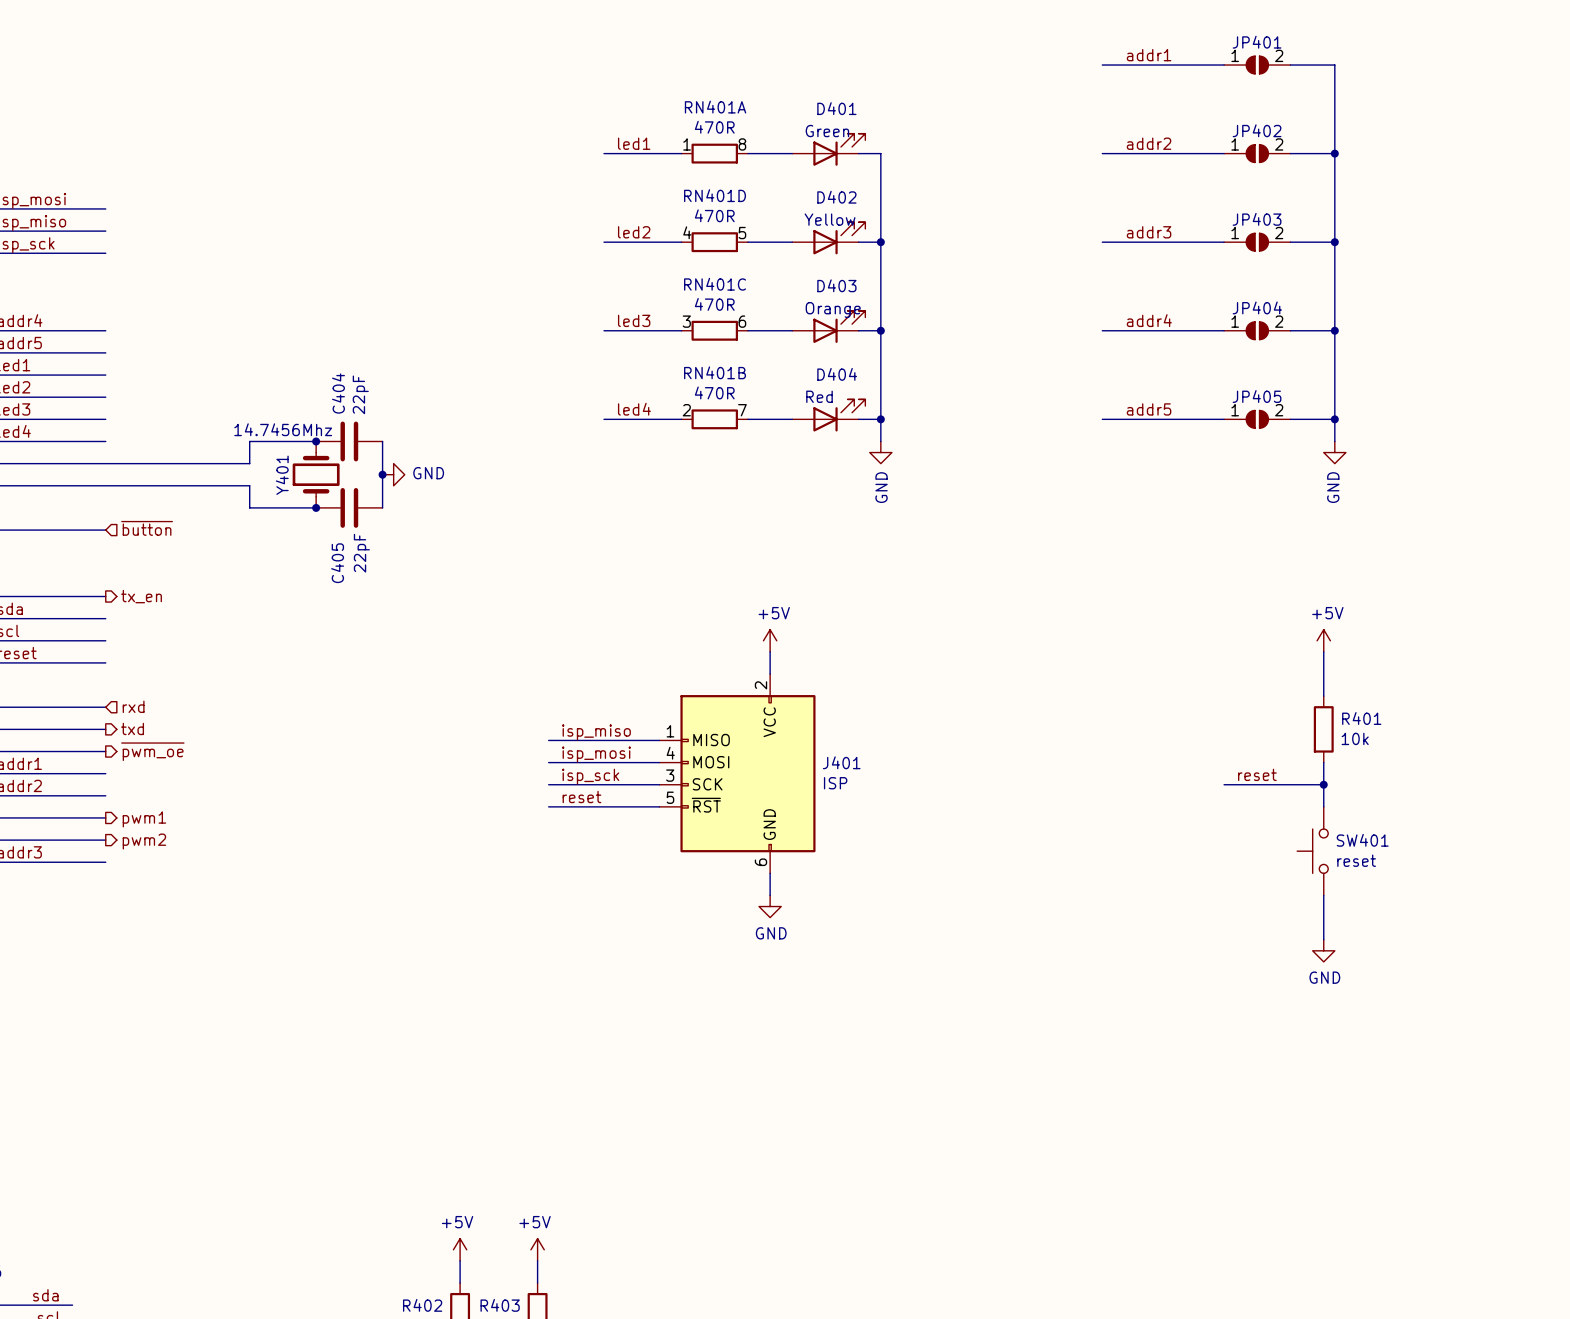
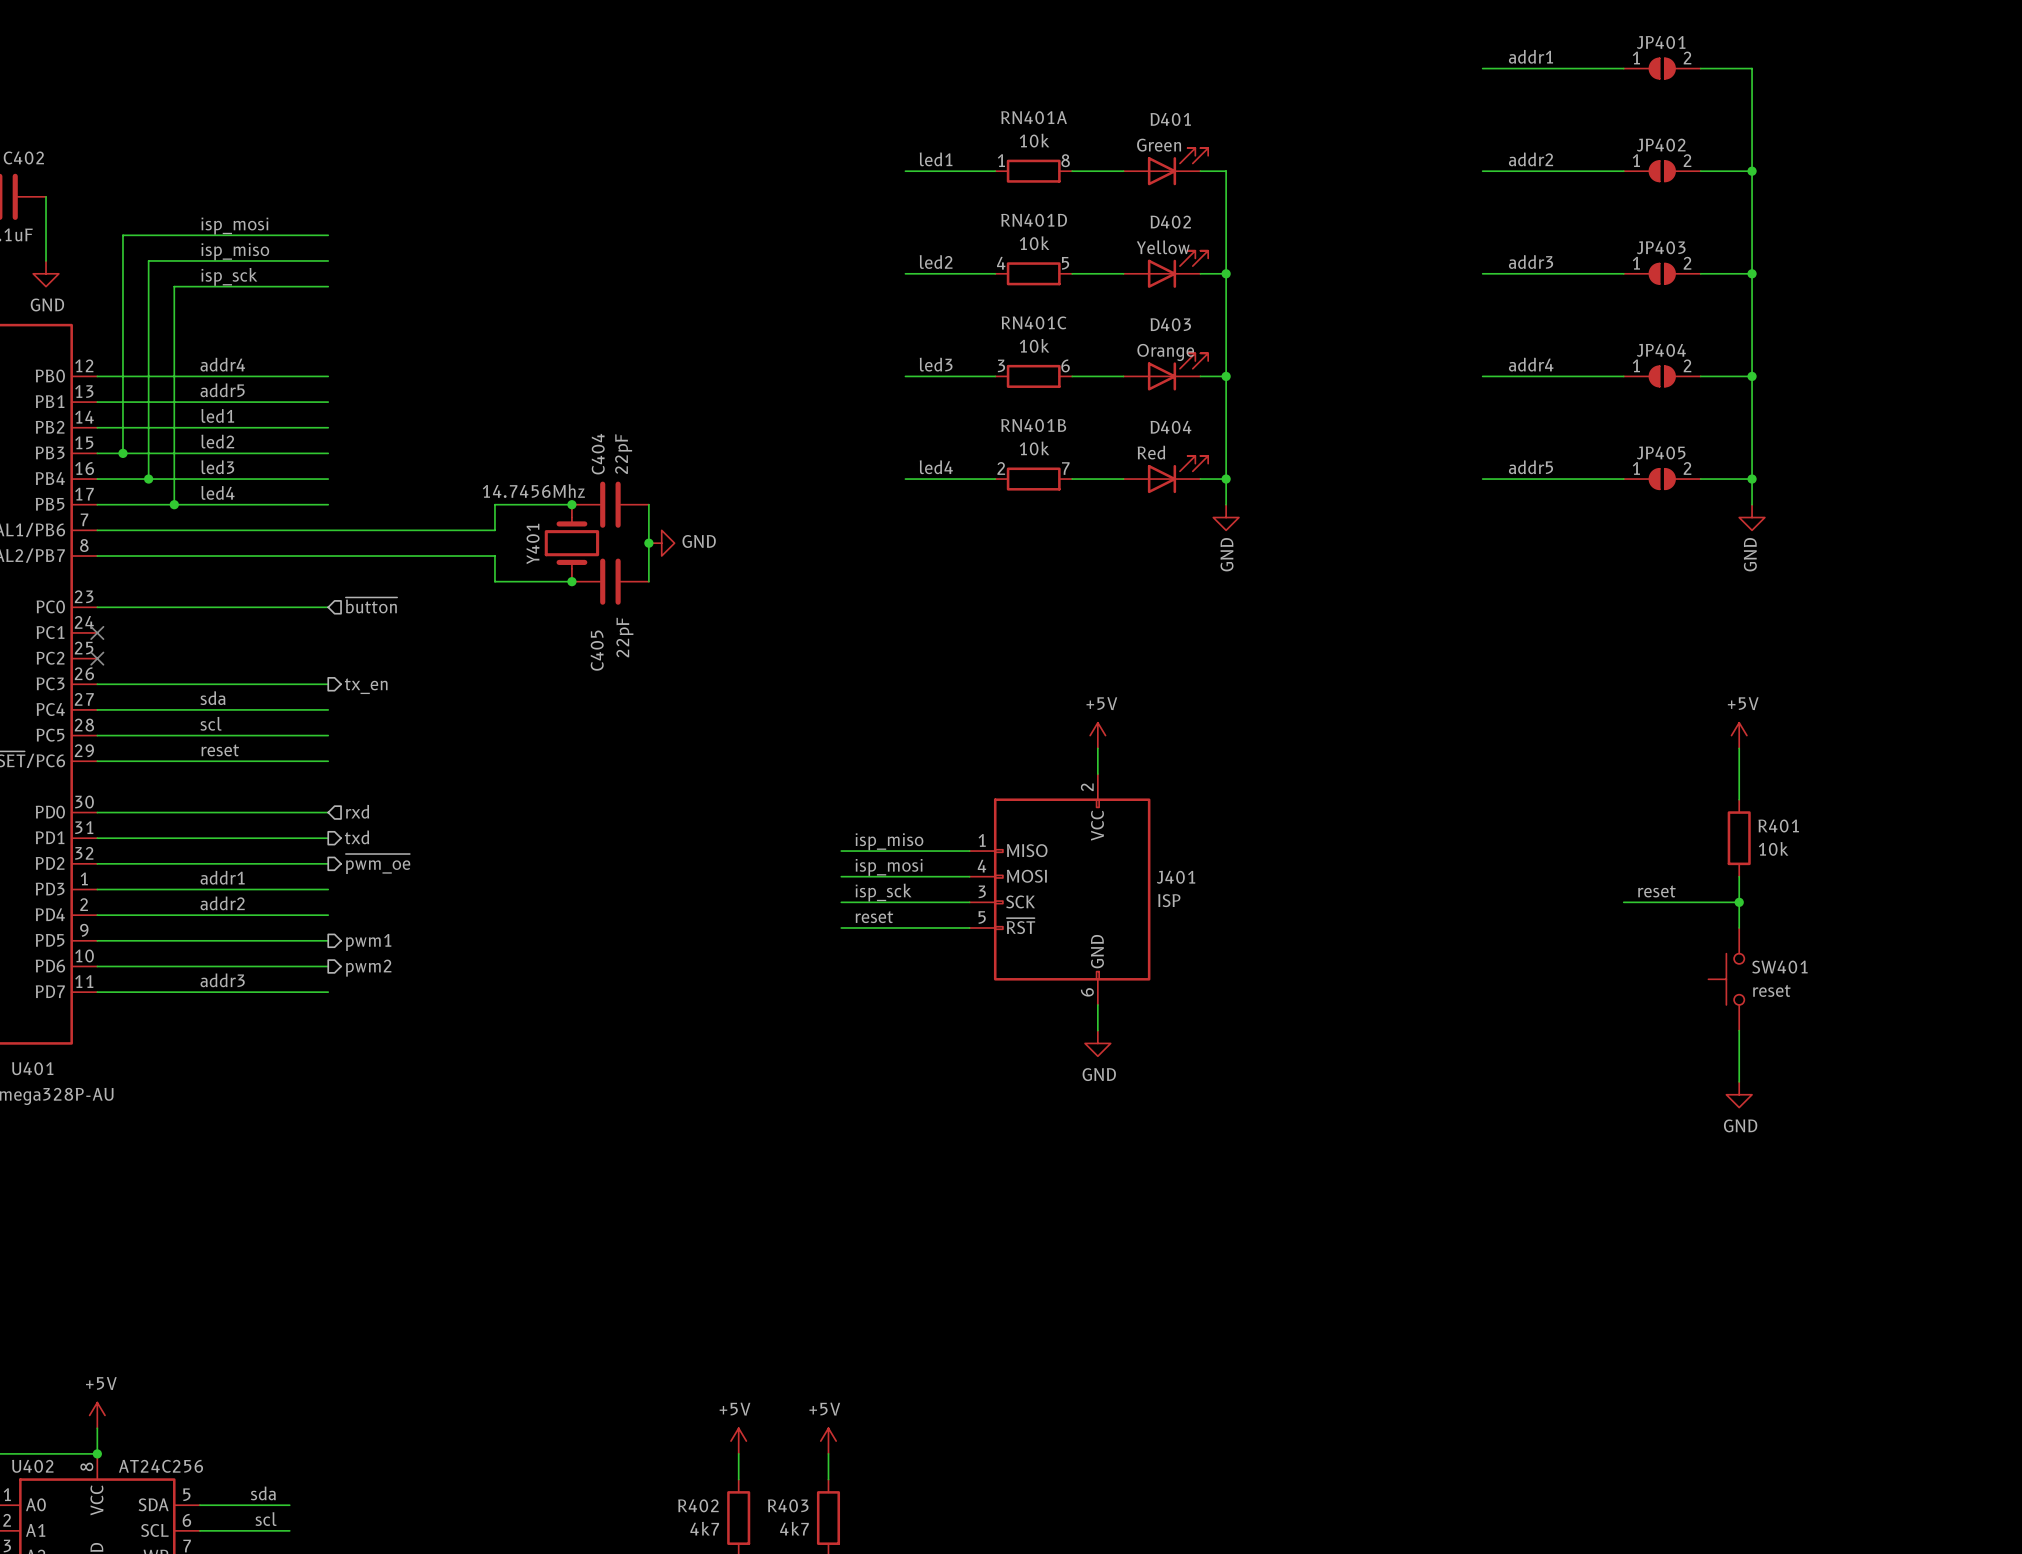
RN401A value: 470R (714, 127) -> 10k (1034, 140)
RN401D value: 470R (714, 215) -> 10k (1034, 243)
RN401C value: 470R (714, 304) -> 10k (1034, 345)
RN401B value: 470R (714, 392) -> 10k (1034, 448)

